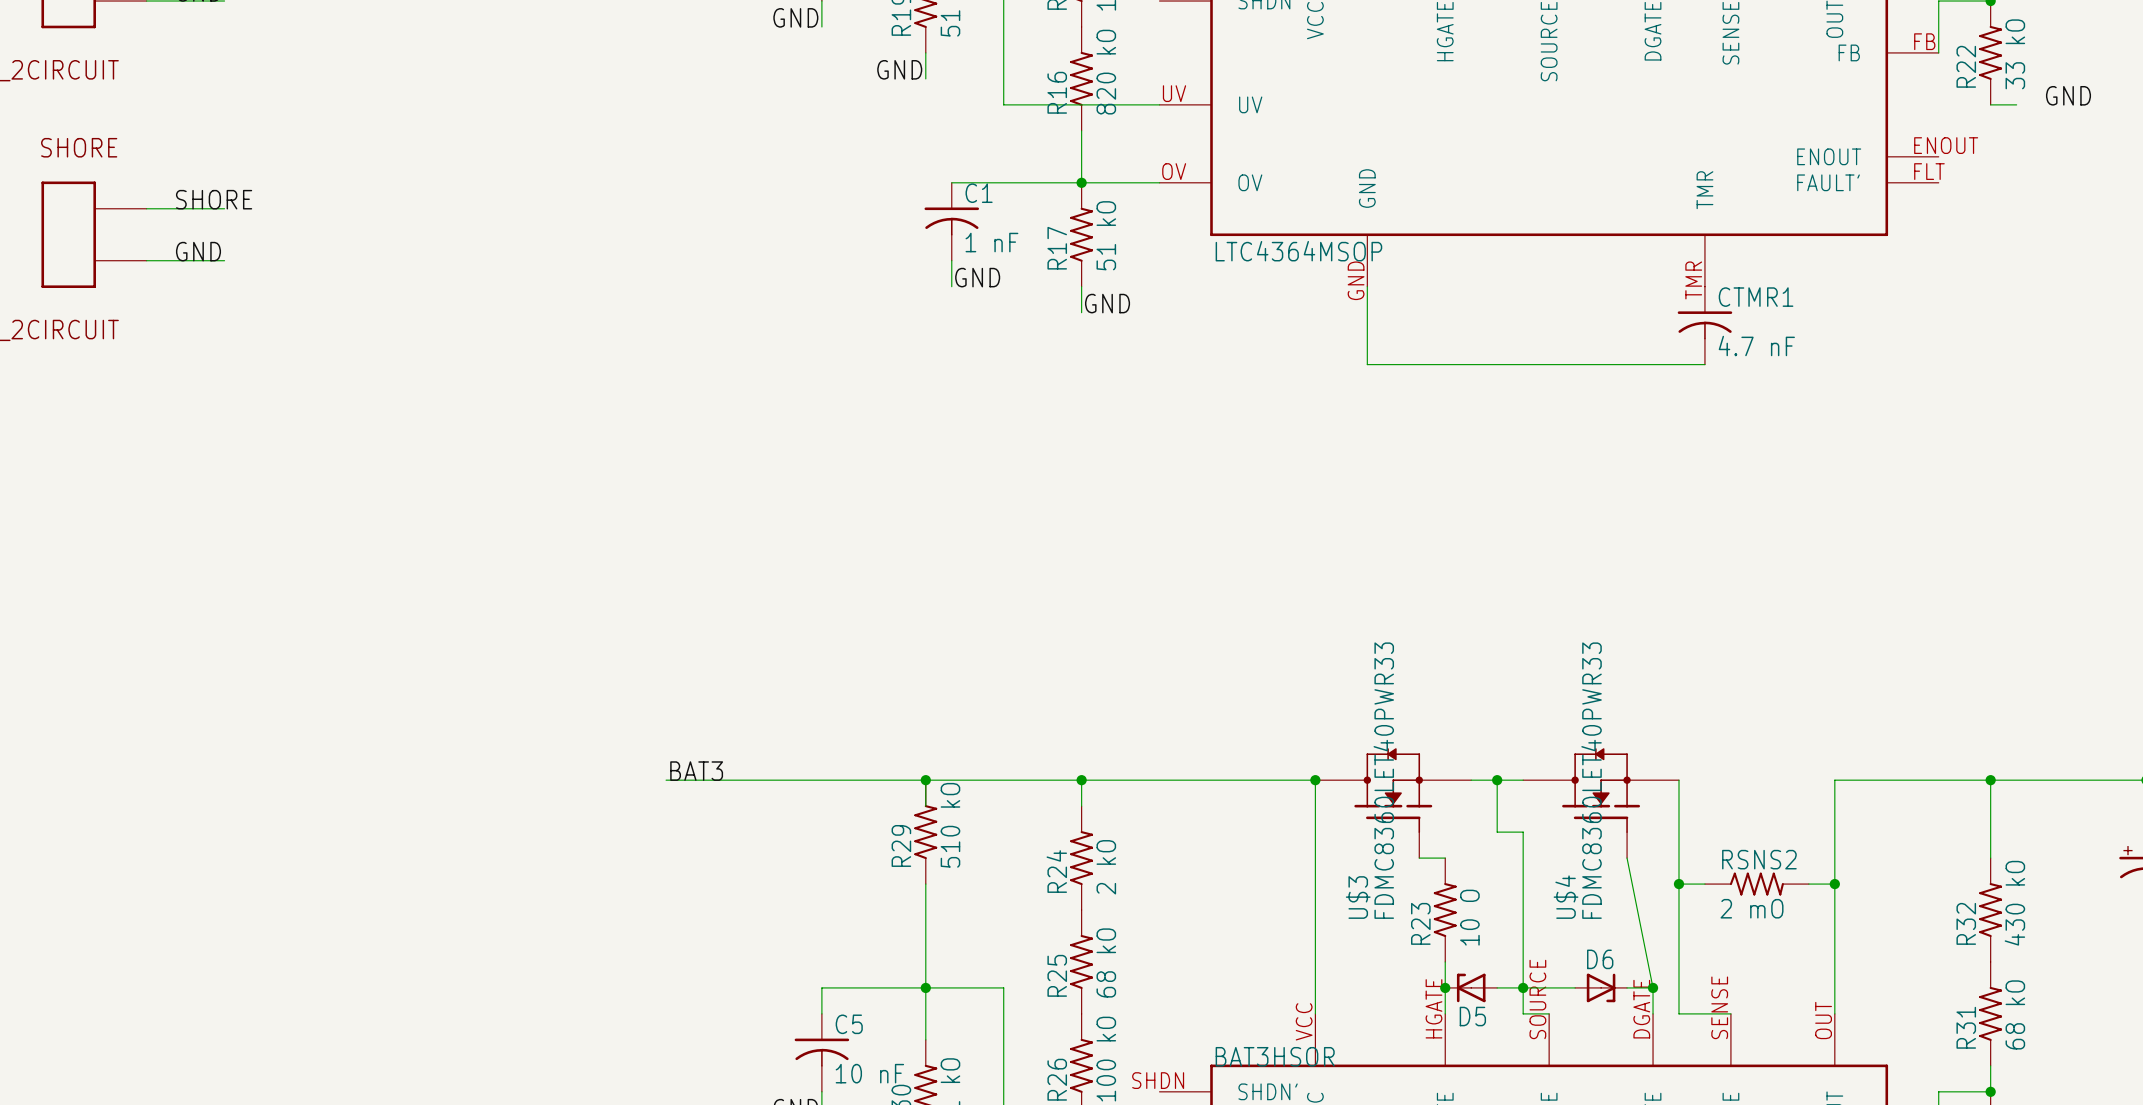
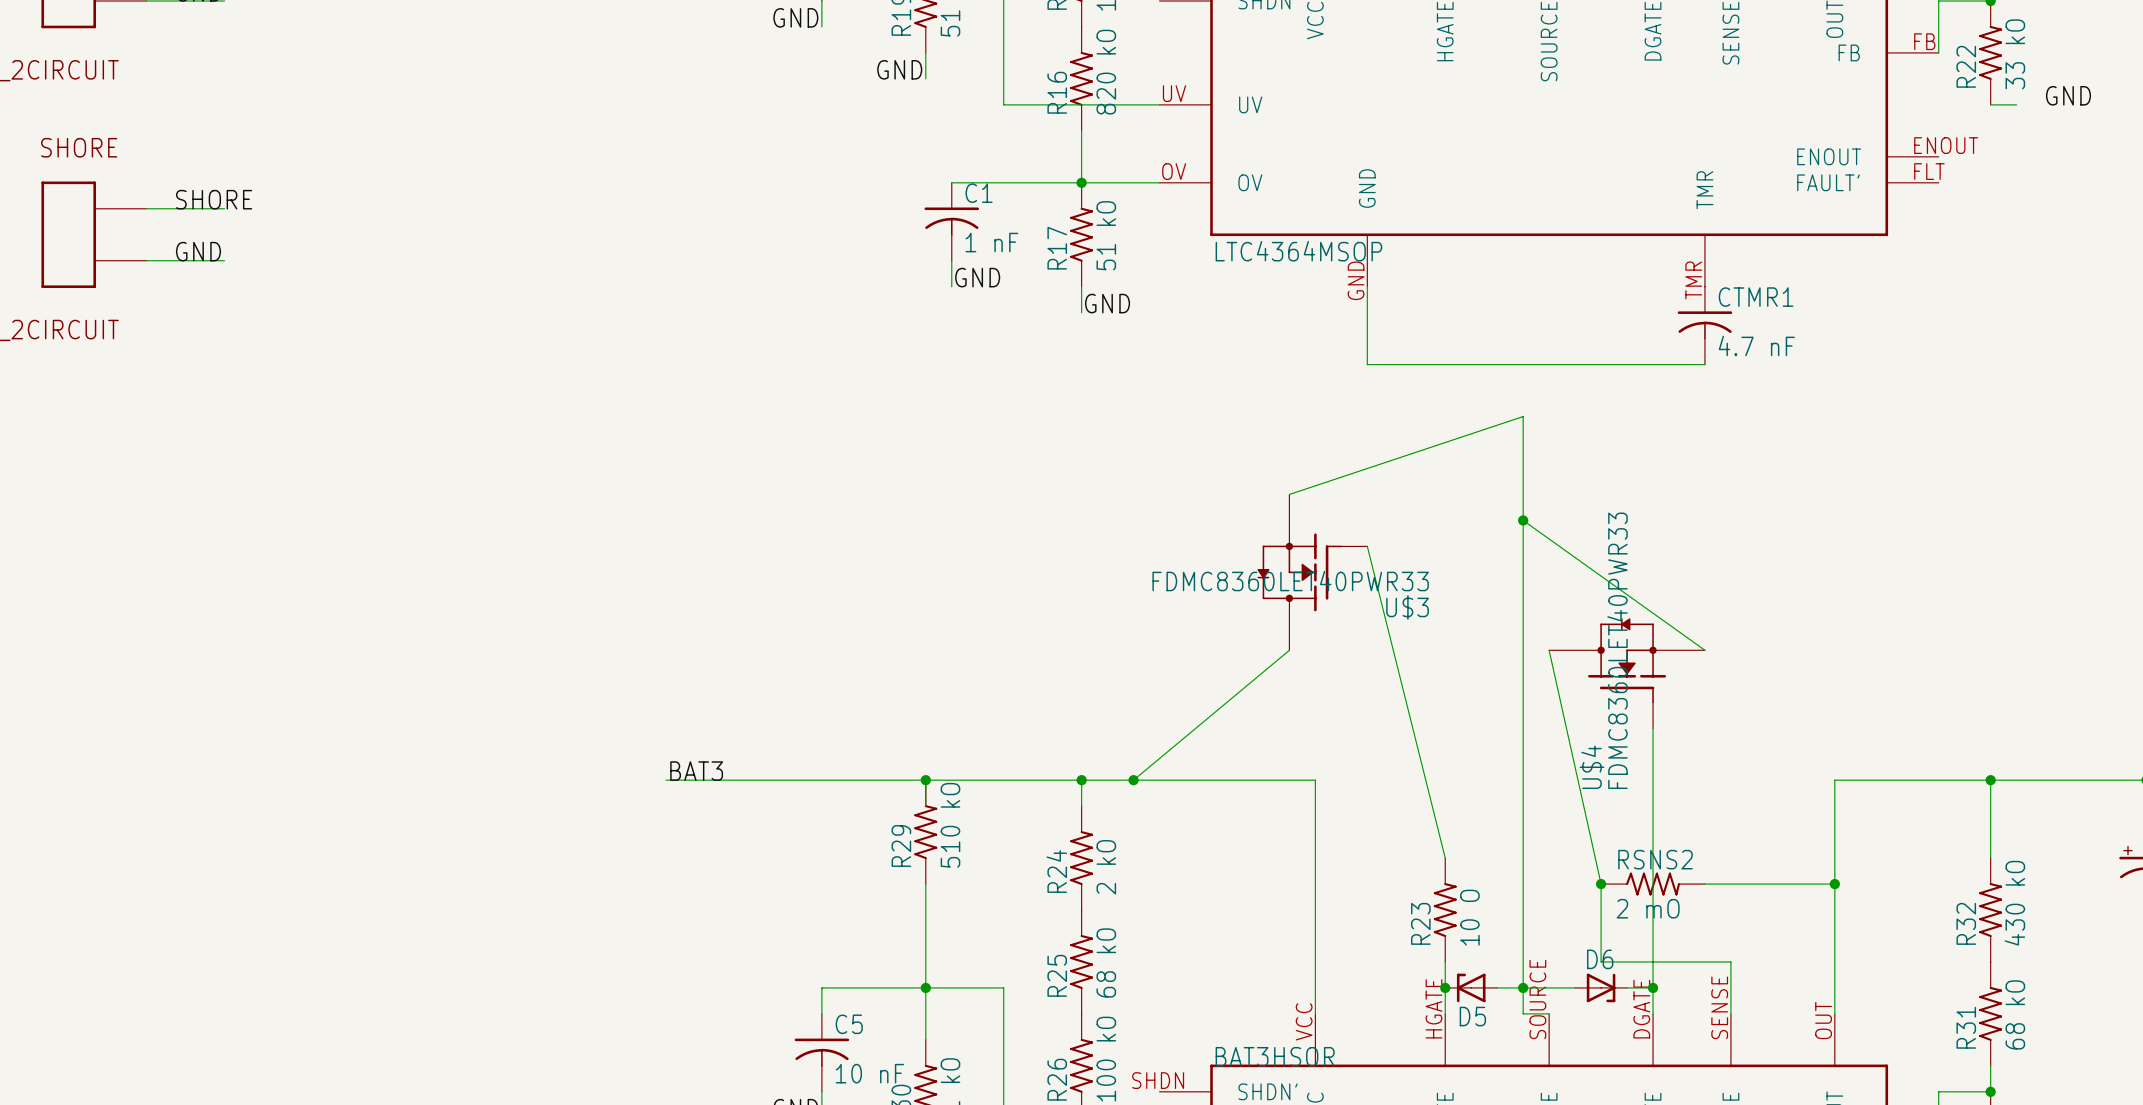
wire: none -> (1523, 520) (1704, 650)
junction: none -> (1523, 520)
wire: none -> (1289, 650) (1133, 780)
junction: none -> (1133, 780)
junction: (1315, 780) -> none
wire: (1471, 780) (1523, 780) -> none
wire: (1497, 780) (1497, 832) (1523, 832) -> (1289, 494) (1523, 416) (1523, 832)
junction: (1497, 780) -> none
wire: (1678, 780) (1678, 1013) (1730, 1013) -> (1549, 650) (1601, 884) (1601, 961) (1730, 961) (1730, 1013)
U$3 rotation: 0° (1393, 790) -> 90° counterclockwise (1299, 572)
U$3 position: (1393, 803) -> (1312, 572)
U$4 position: (1601, 803) -> (1627, 673)
wire: (1419, 858) (1445, 858) -> (1367, 546) (1445, 858)
wire: (1627, 858) (1653, 987) -> (1653, 728) (1653, 987)
junction: none -> (1601, 884)
junction: (1678, 884) -> none
RSNS2 position: (1756, 884) -> (1653, 884)

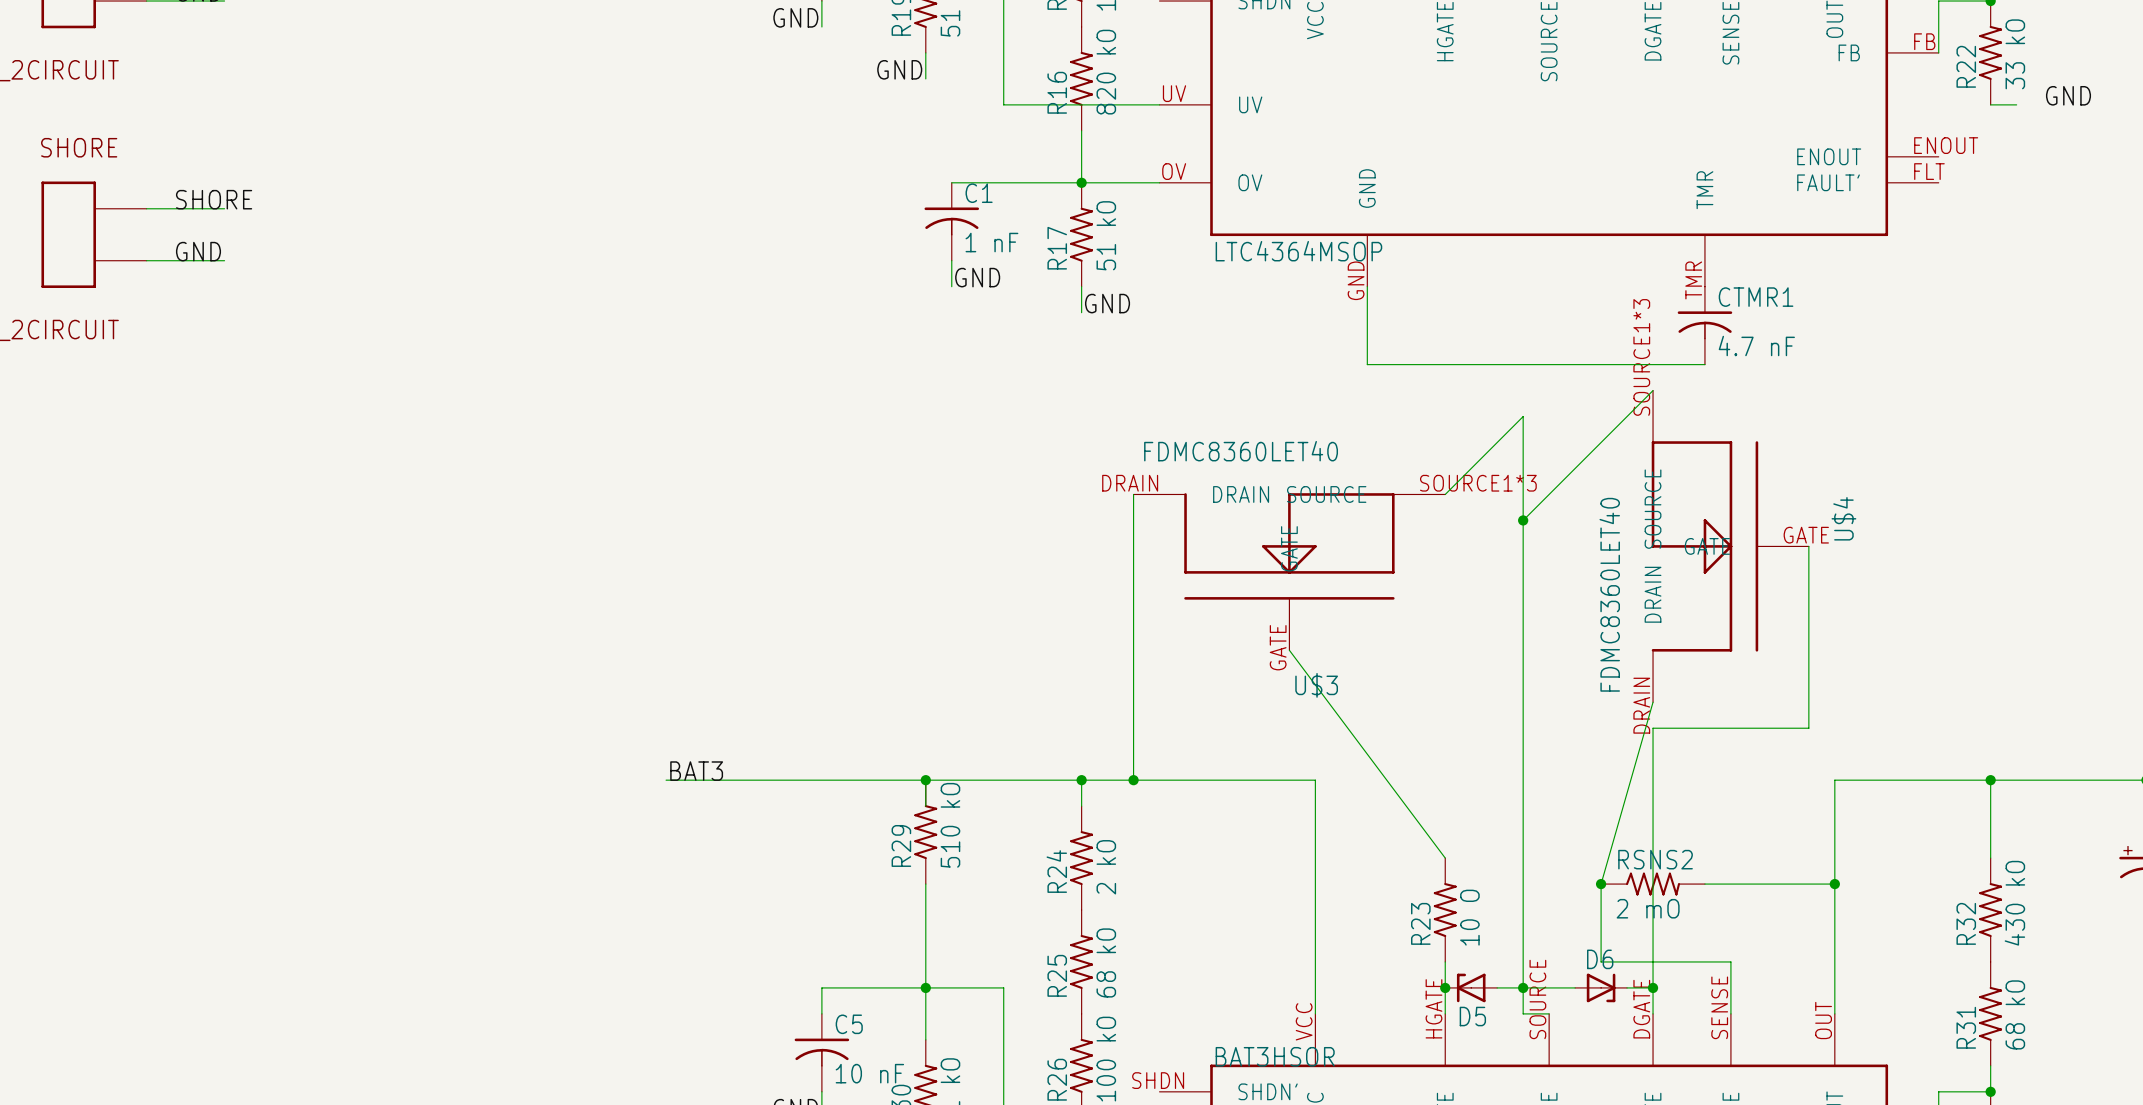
wire: (1523, 416) (1289, 494) -> (1523, 416) (1445, 494)
U$3 symbol: [1257, 494, 1368, 651] -> [1133, 493, 1446, 651]
wire: (1523, 520) (1704, 650) -> (1523, 520) (1653, 390)
wire: (1367, 546) (1445, 858) -> (1289, 650) (1445, 858)
wire: none -> (1808, 546) (1808, 728) (1653, 728)
U$3 value: FDMC8360LET40PWR33 (1290, 581) -> FDMC8360LET40 (1241, 451)
U$3 name position: U$3 (1407, 607) -> U$3 (1316, 685)
U$4 symbol: [1549, 618, 1705, 729] -> [1651, 390, 1809, 703]
wire: (1289, 650) (1133, 780) -> (1133, 494) (1133, 780)
wire: (1549, 650) (1601, 884) -> (1653, 702) (1601, 884)
U$4 value: FDMC8360LET40PWR33 (1617, 650) -> FDMC8360LET40 (1609, 594)
U$4 name position: U$4 (1591, 767) -> U$4 (1843, 518)

